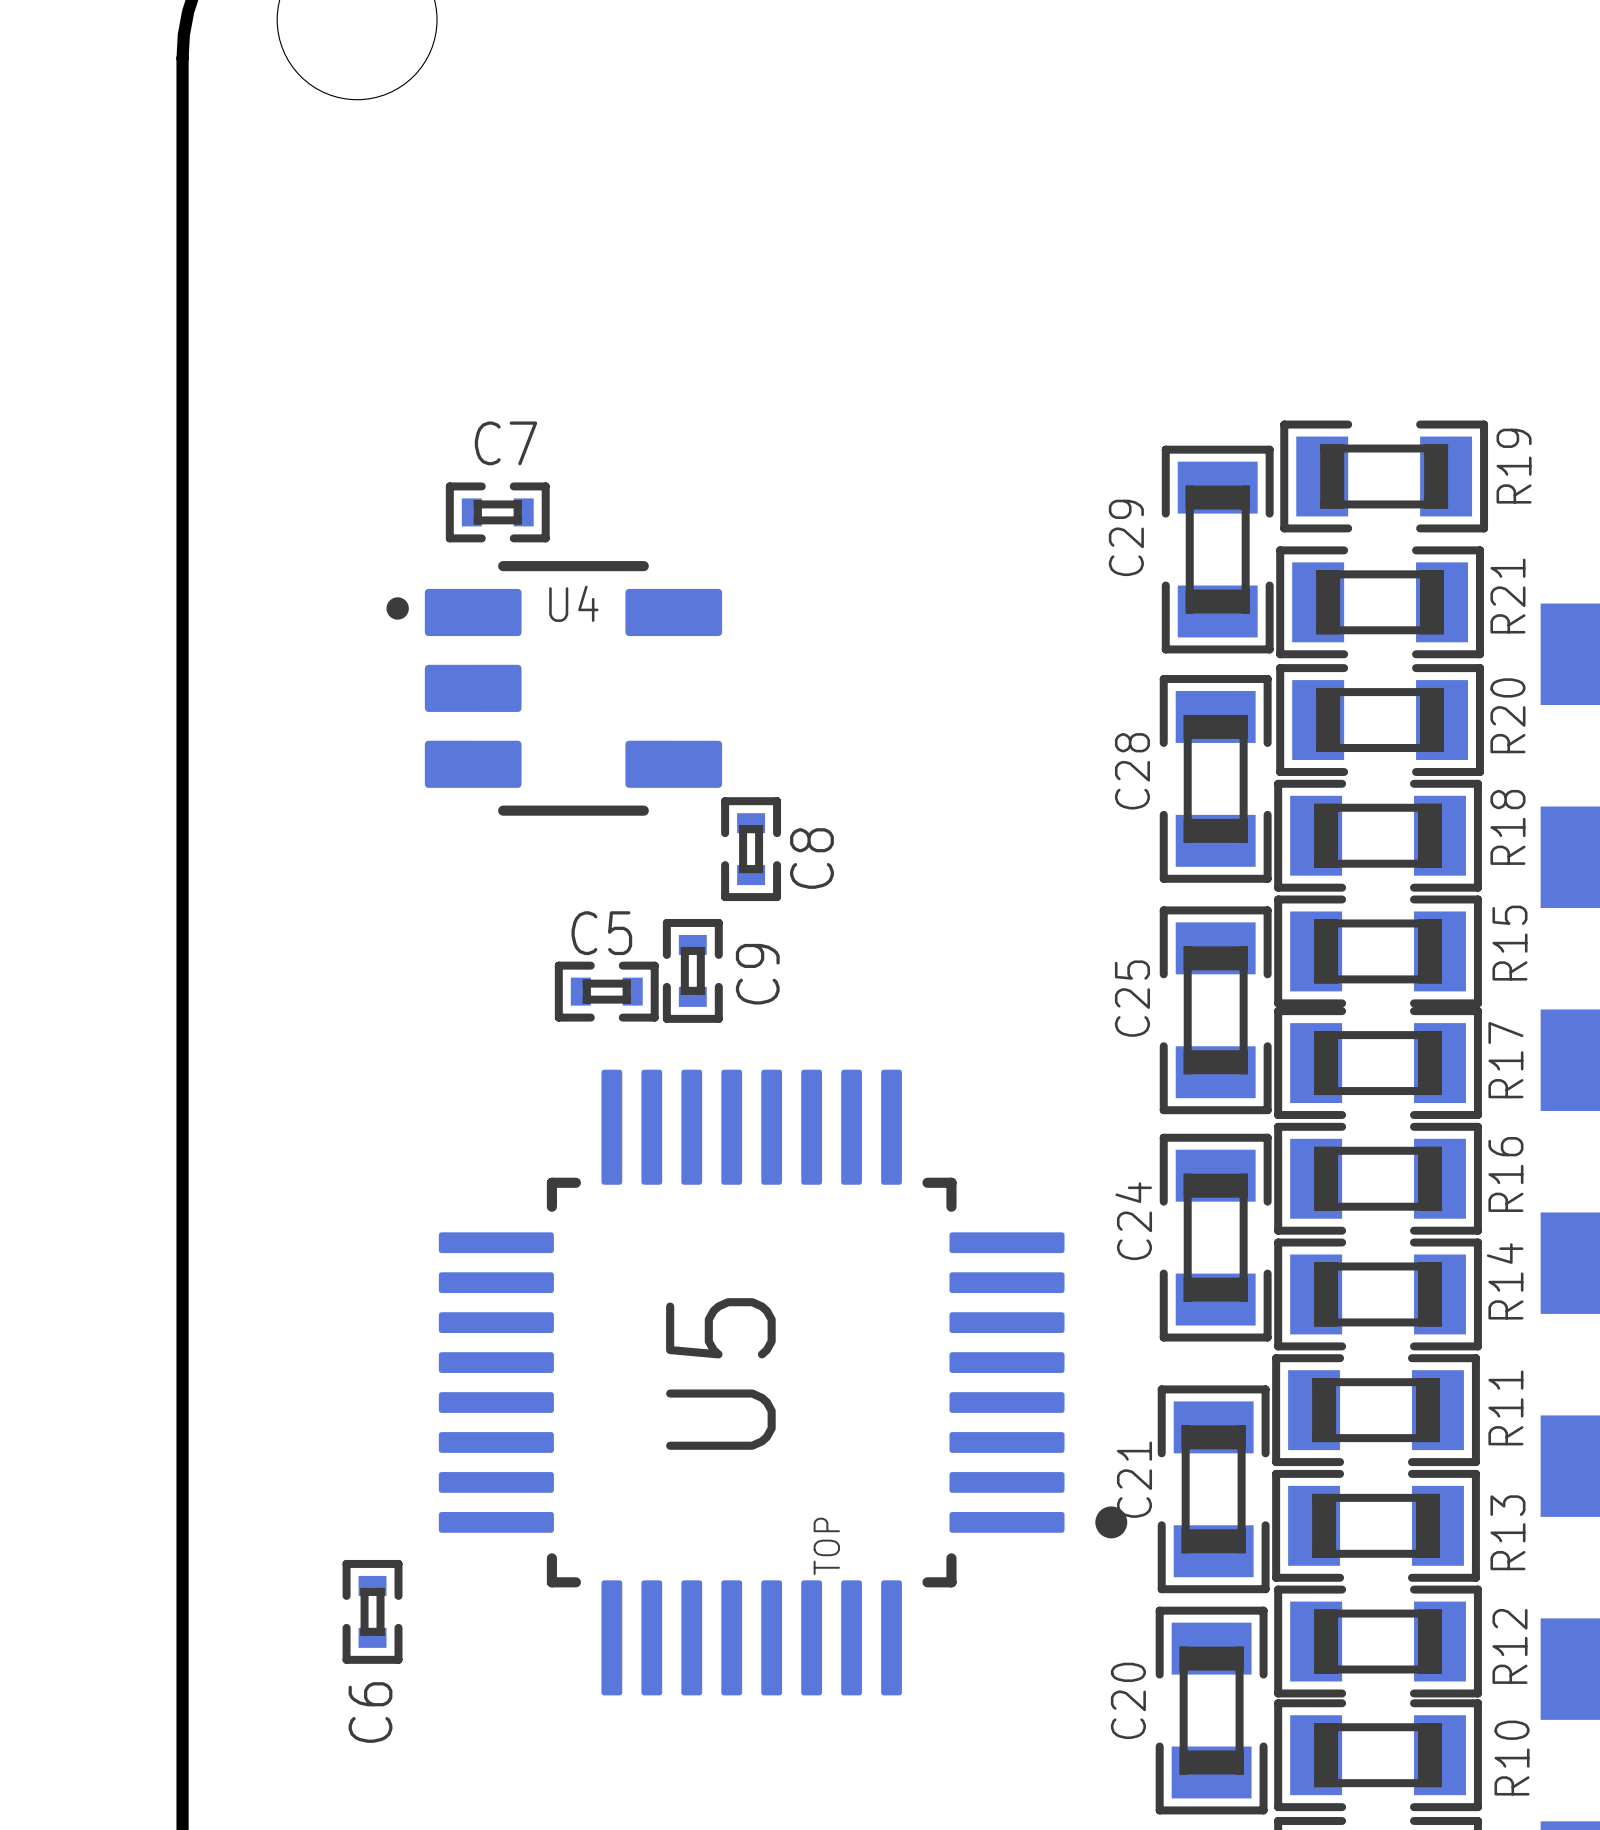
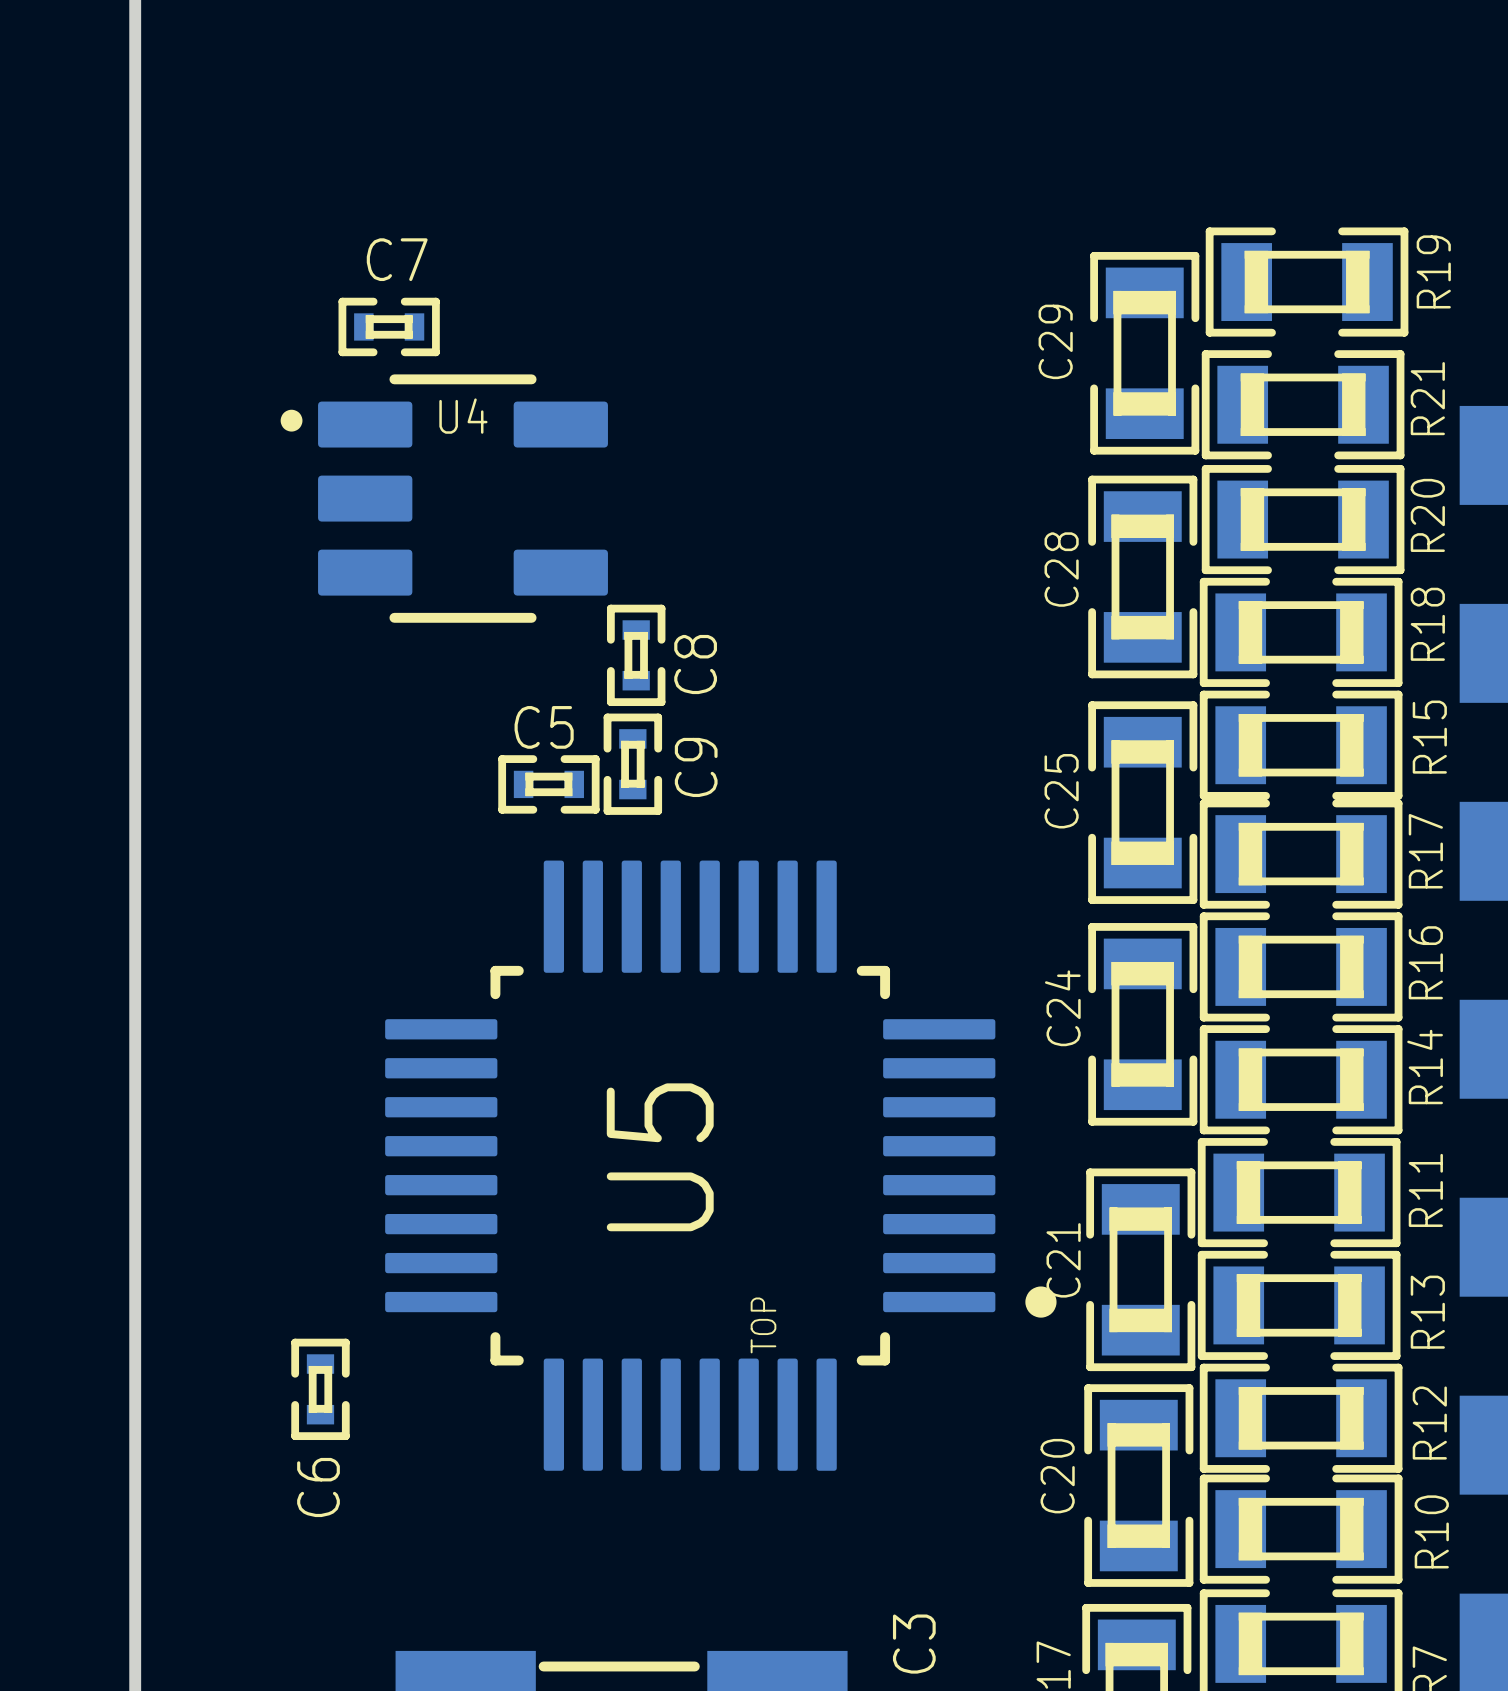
C7 position: (497, 512) -> (389, 326)
U4 position: (554, 688) -> (444, 498)
C8 position: (751, 849) -> (636, 655)

